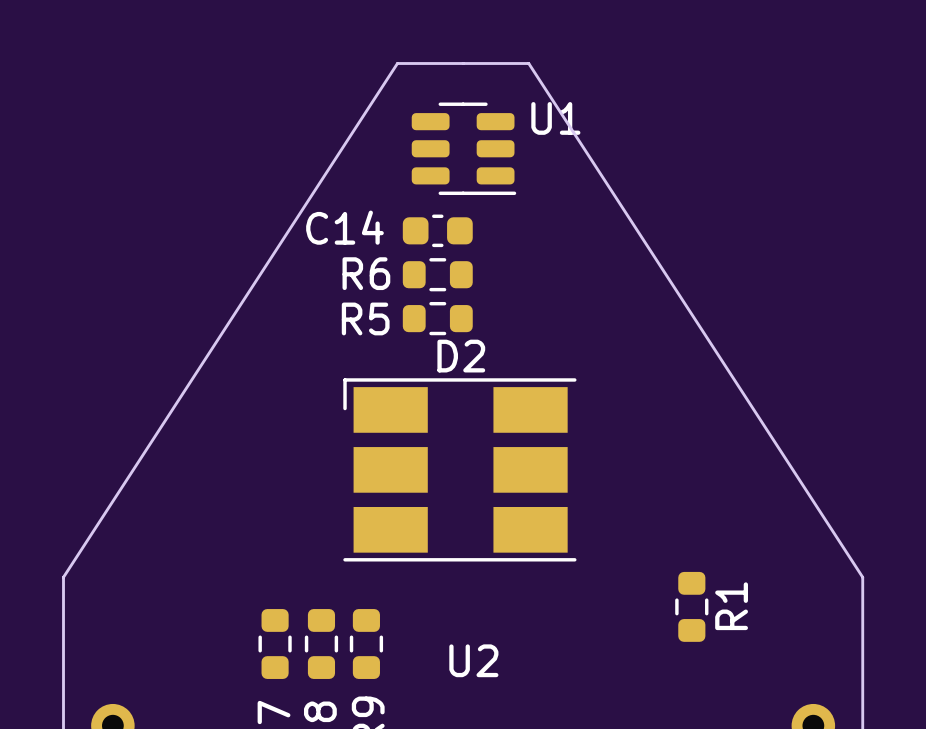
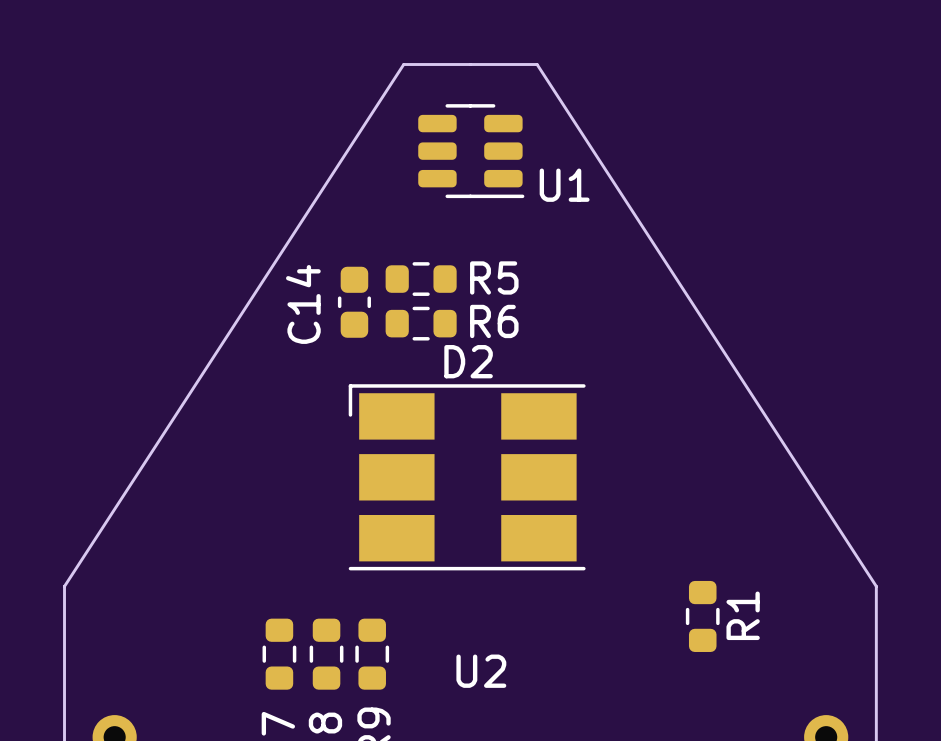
U1 name position: U1 (555, 118) -> U1 (564, 185)
C14 rotation: 0° (437, 230) -> 90° clockwise (354, 302)
C14 position: (437, 230) -> (354, 302)
R6 name position: R6 (366, 273) -> R6 (494, 321)
R6 position: (437, 274) -> (421, 323)
R5 name position: R5 (365, 318) -> R5 (494, 277)
R5 position: (437, 318) -> (421, 279)

